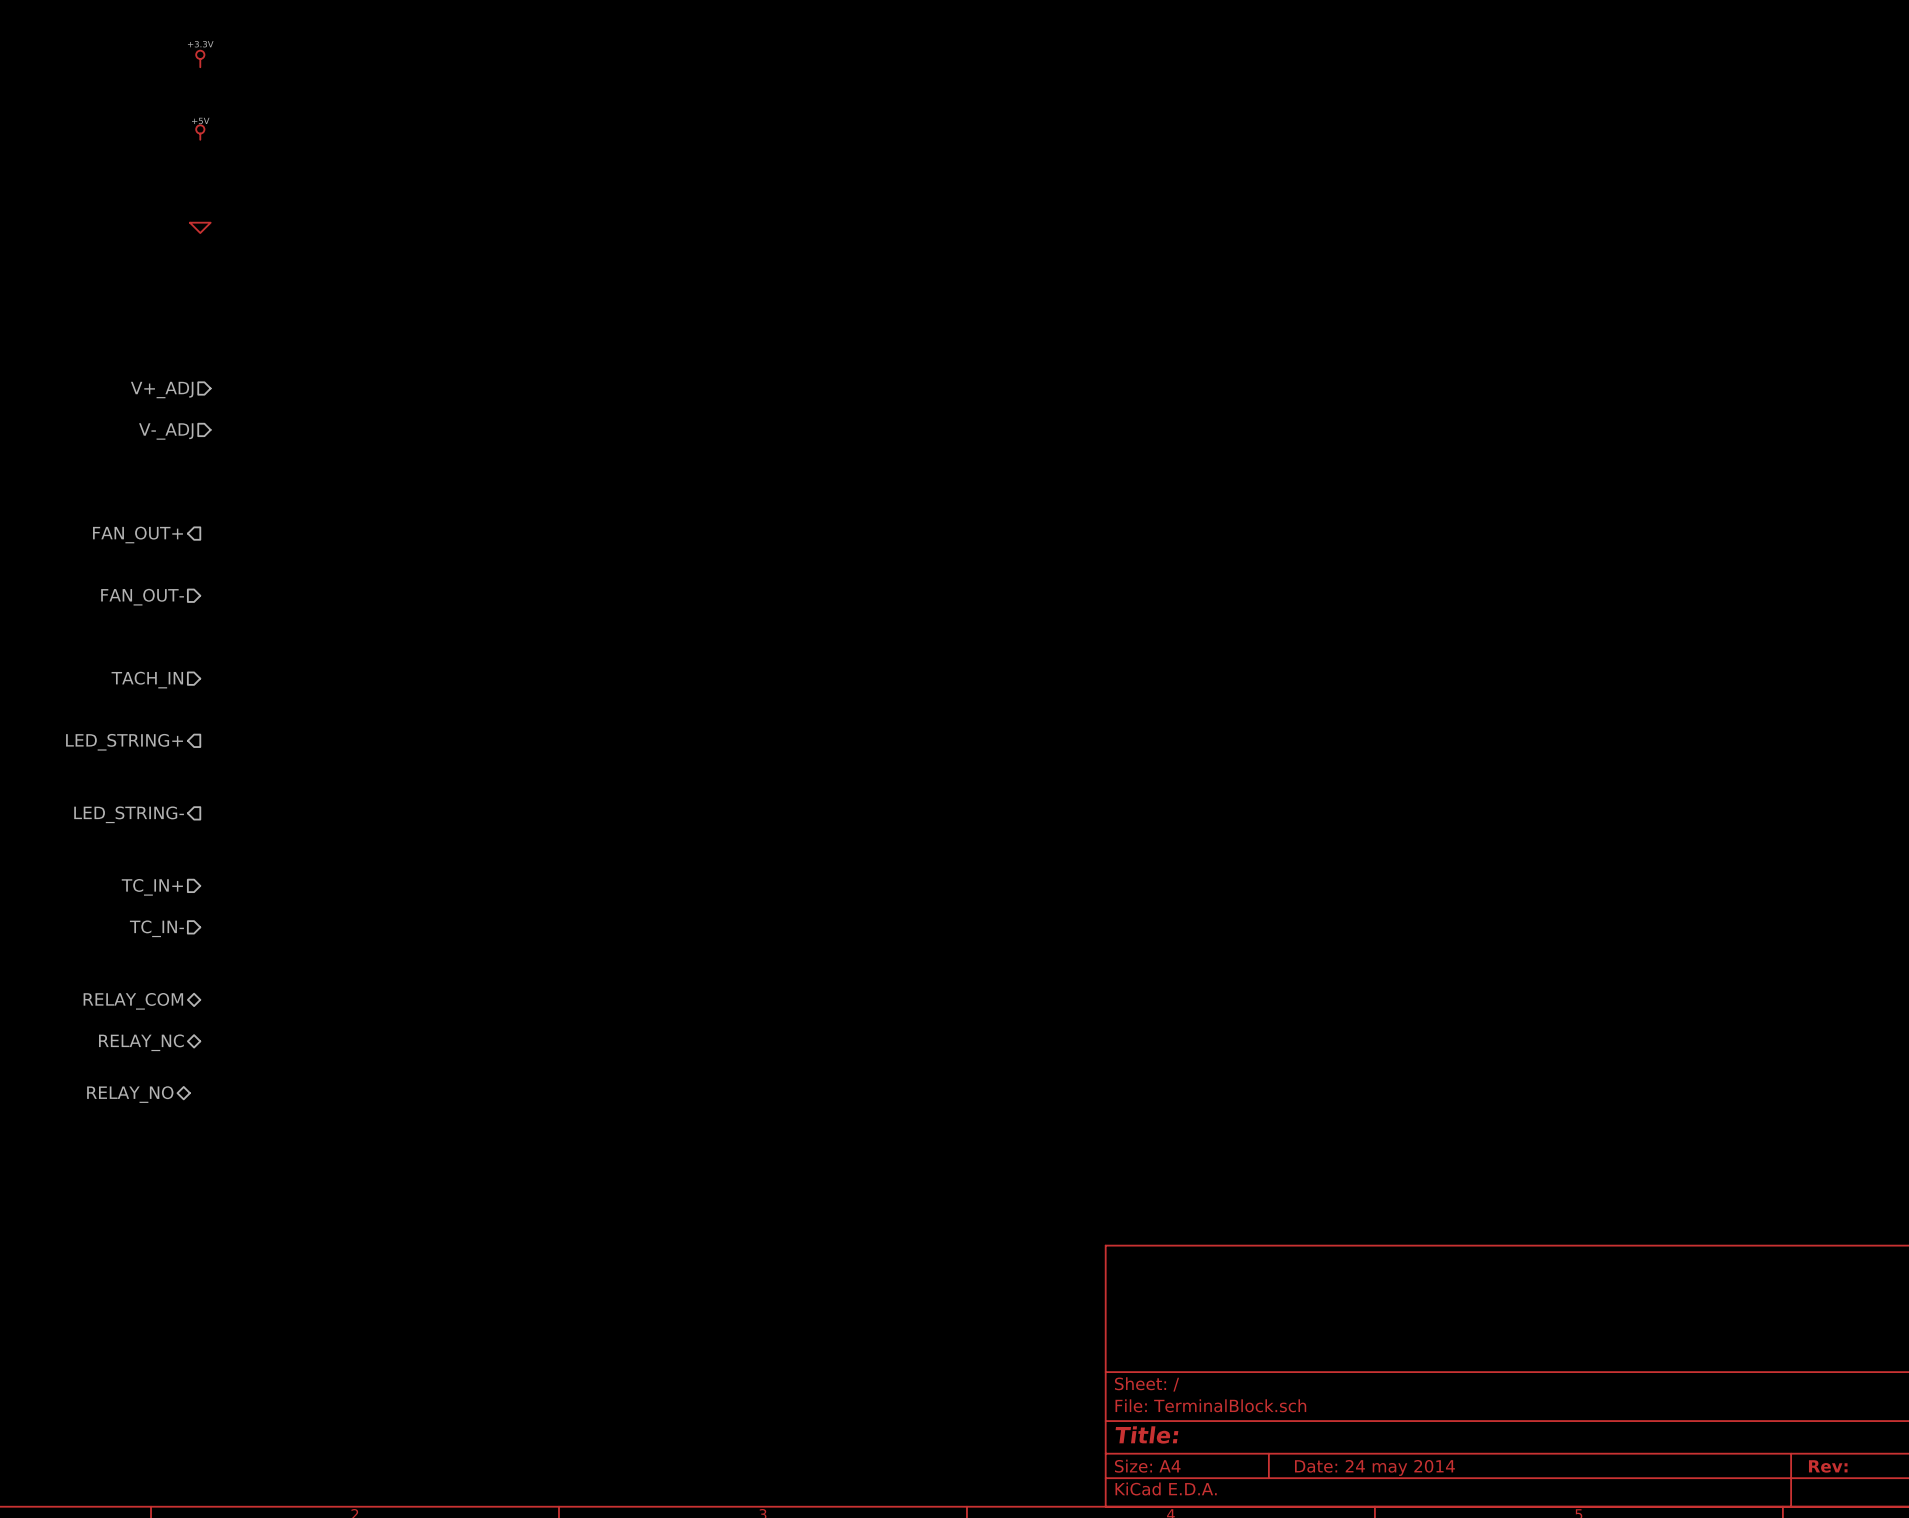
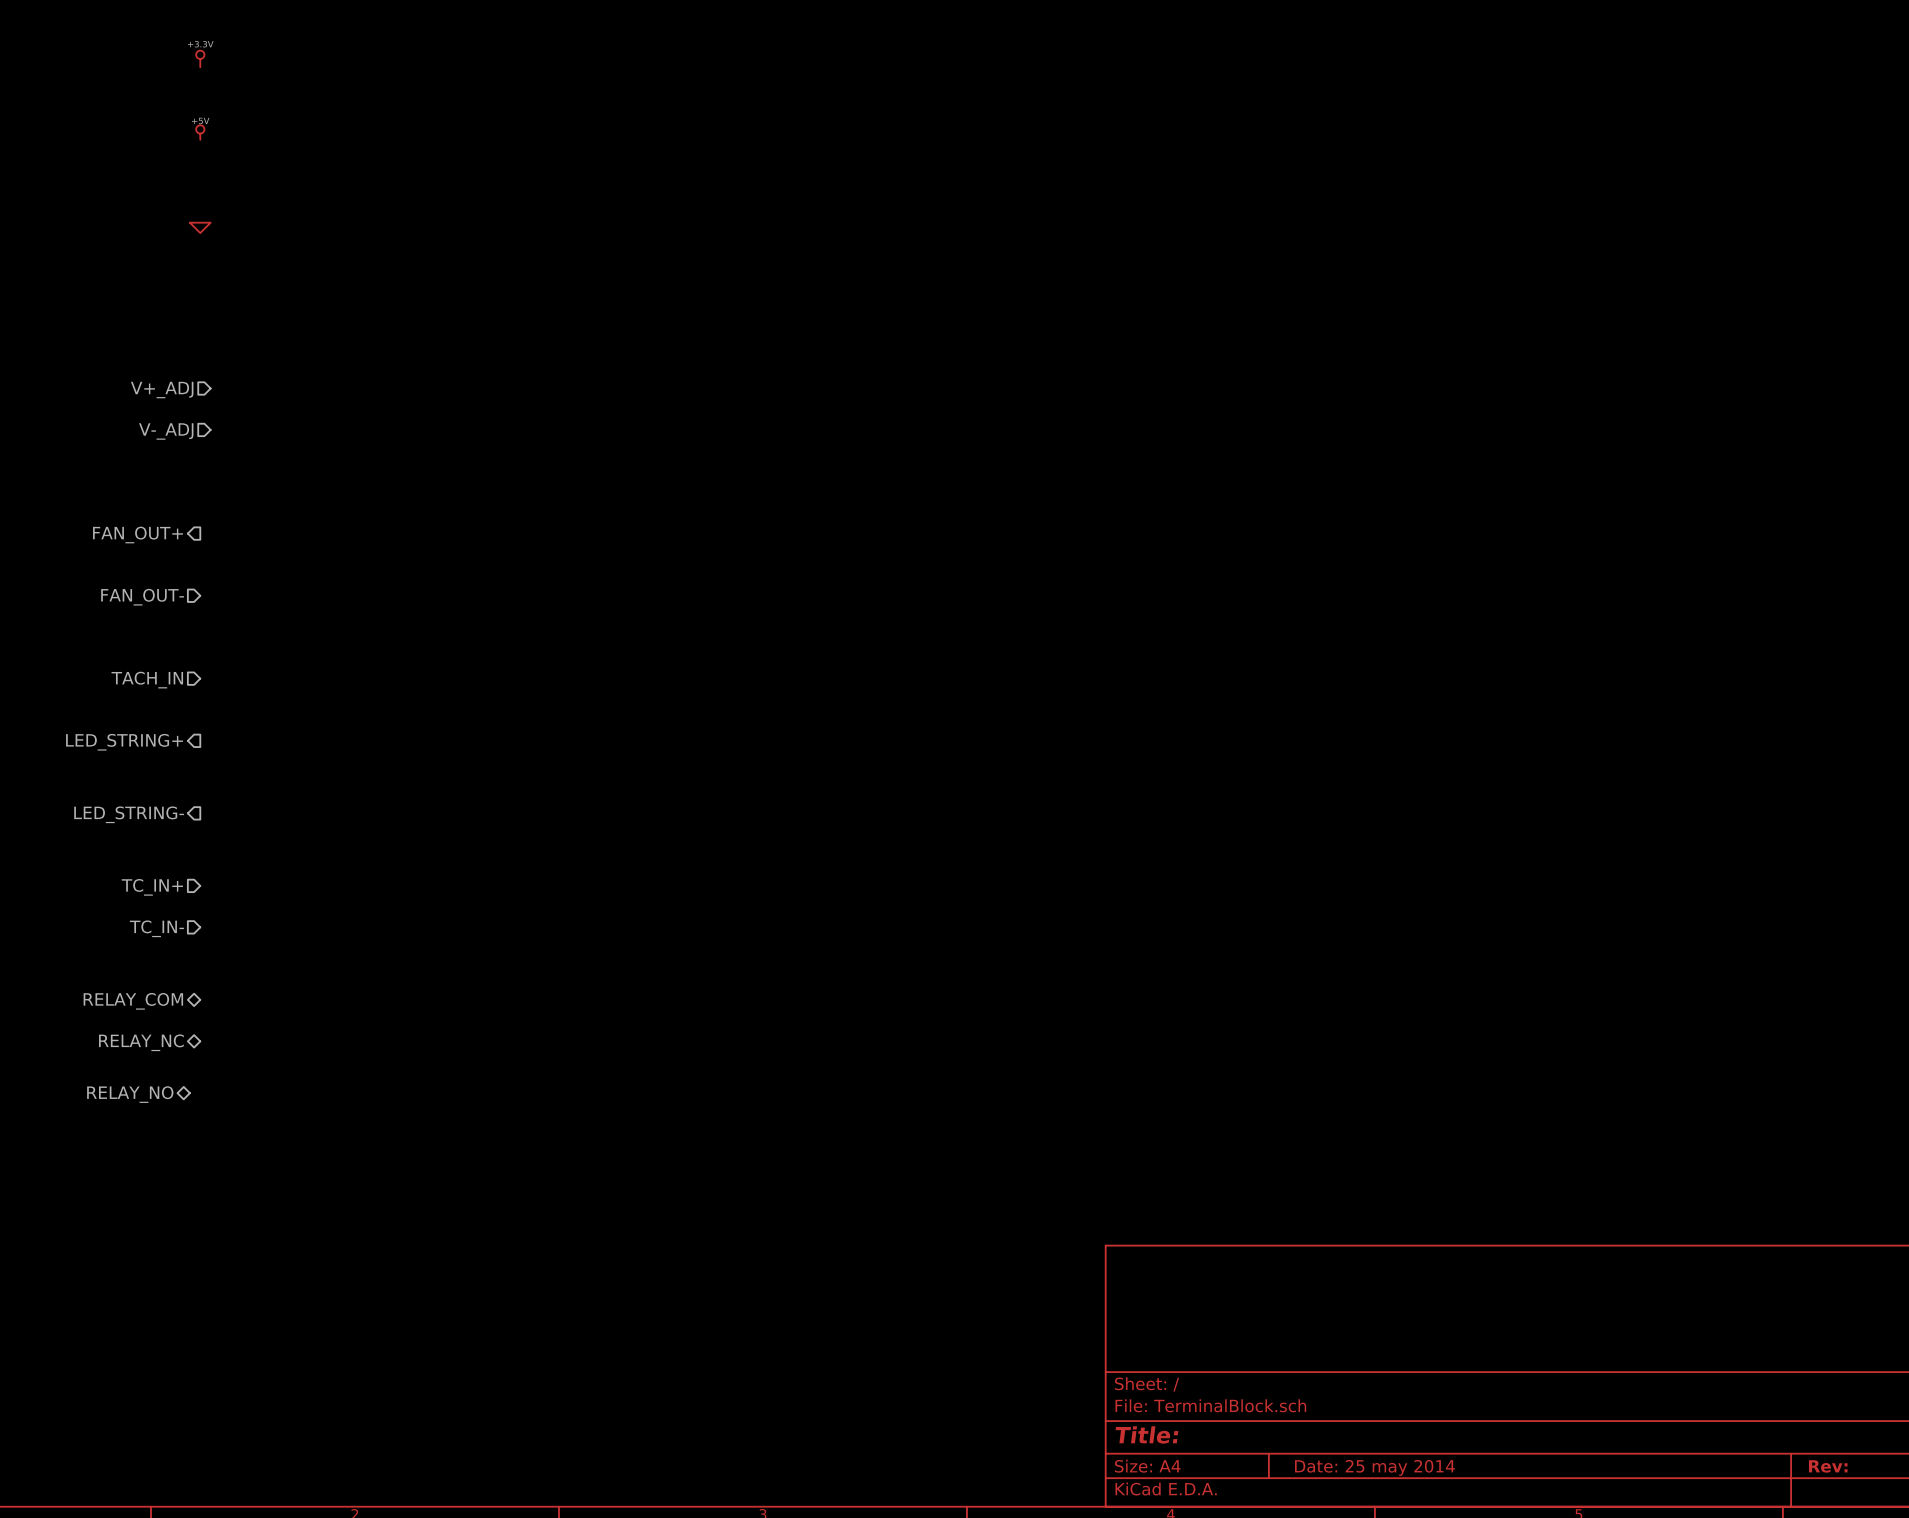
title block: Date: 24 may 2014 (1374, 1467) -> Date: 25 may 2014 (1374, 1467)

